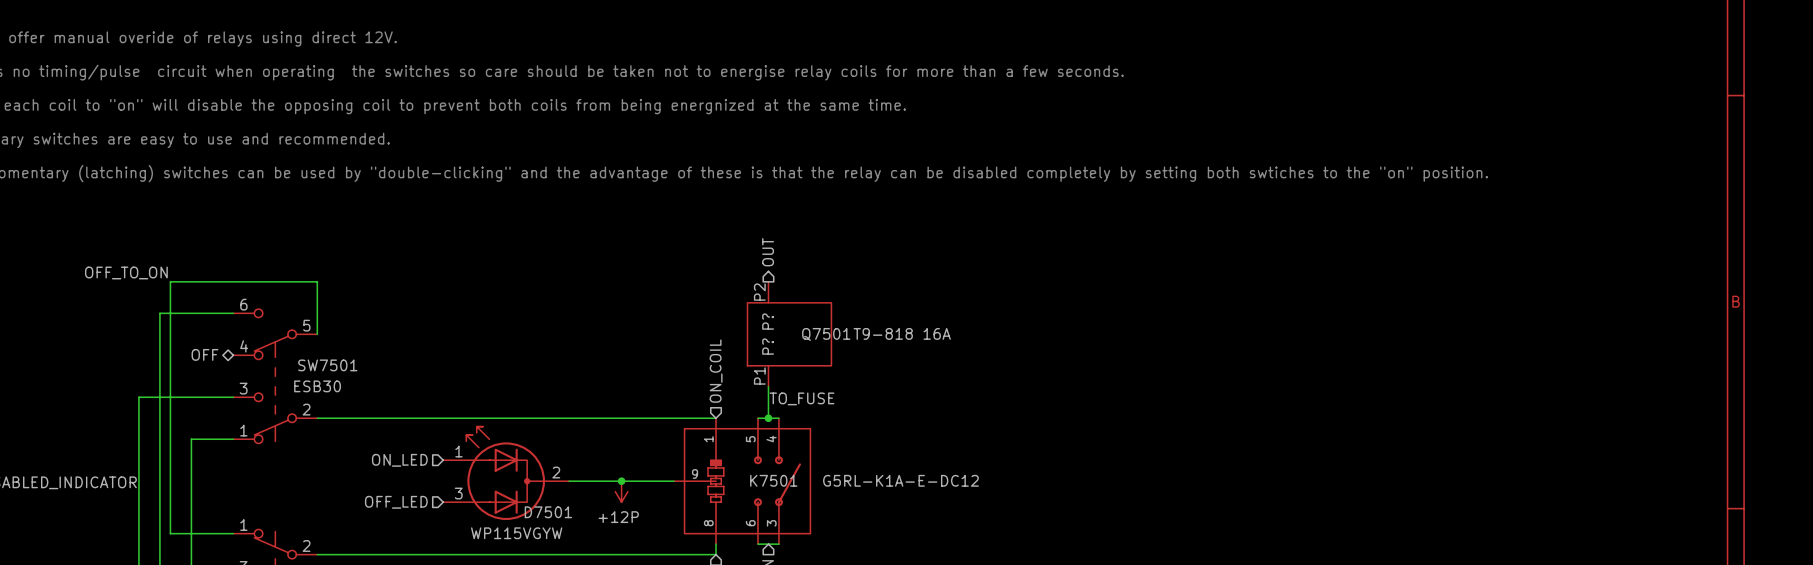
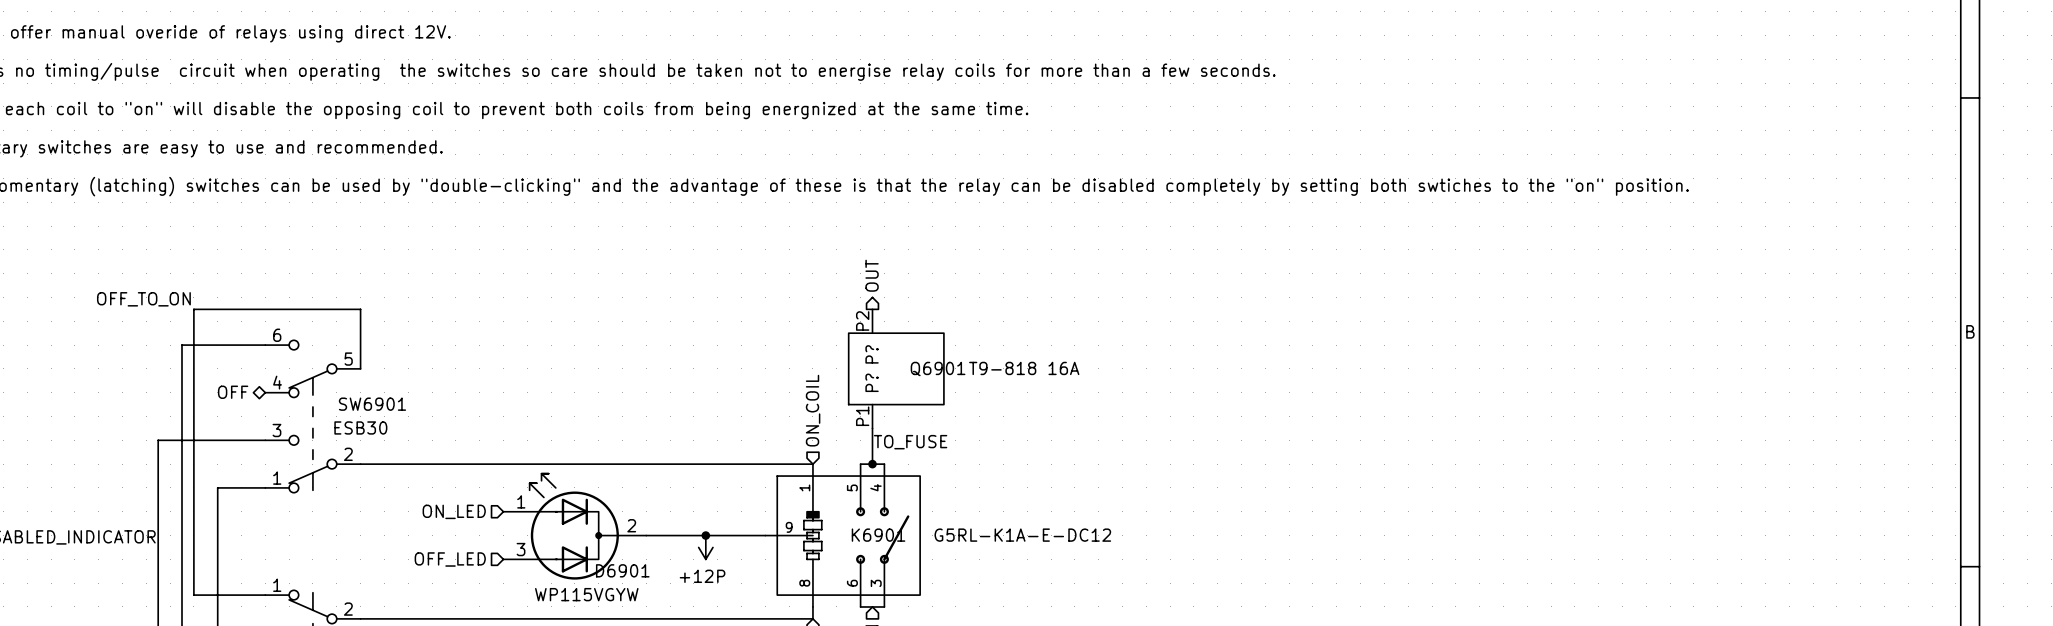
Q7501 name: Q7501 (826, 334) -> Q6901 (938, 369)
SW7501 name: SW7501 (327, 365) -> SW6901 (372, 404)
K7501 name: K7501 (773, 480) -> K6901 (878, 535)
D7501 name: D7501 (548, 512) -> D6901 (622, 570)

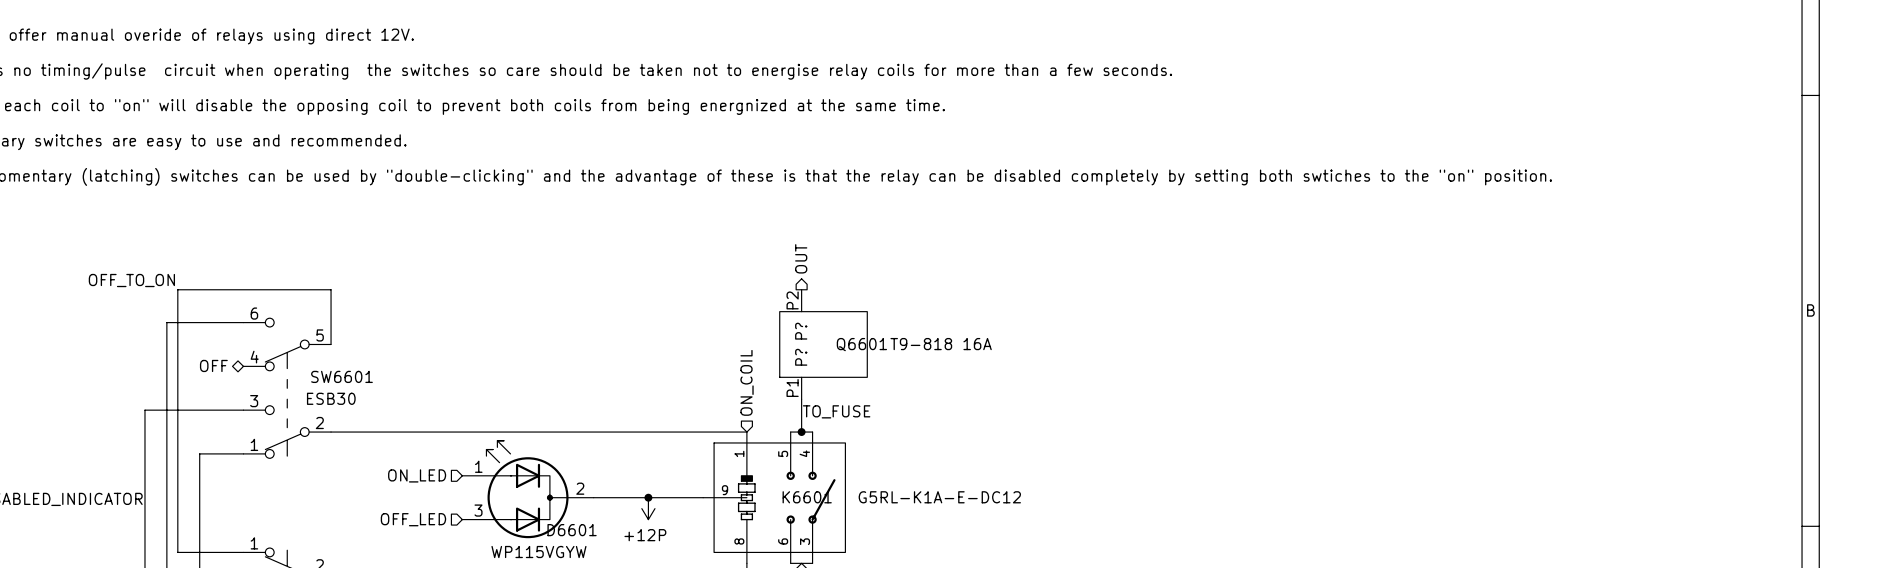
Q6901 name: Q6901 (938, 369) -> Q6601 (861, 344)
SW6901 name: SW6901 (372, 404) -> SW6601 (341, 376)
K6901 name: K6901 (878, 535) -> K6601 (807, 497)
D6901 name: D6901 (622, 570) -> D6601 (572, 530)

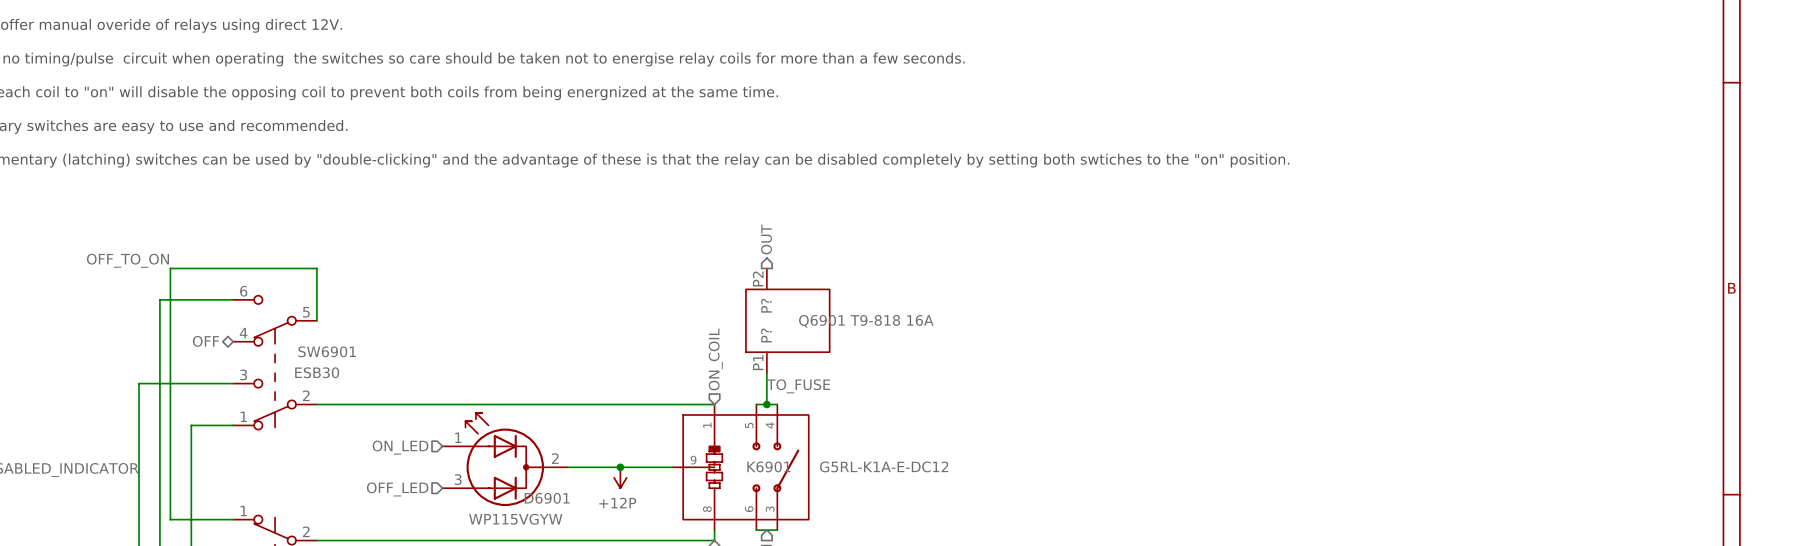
Q6601 name: Q6601 (861, 344) -> Q6901 (821, 321)
SW6601 name: SW6601 (341, 376) -> SW6901 (327, 351)
K6601 name: K6601 (807, 497) -> K6901 (768, 466)
D6601 name: D6601 (572, 530) -> D6901 (547, 498)

